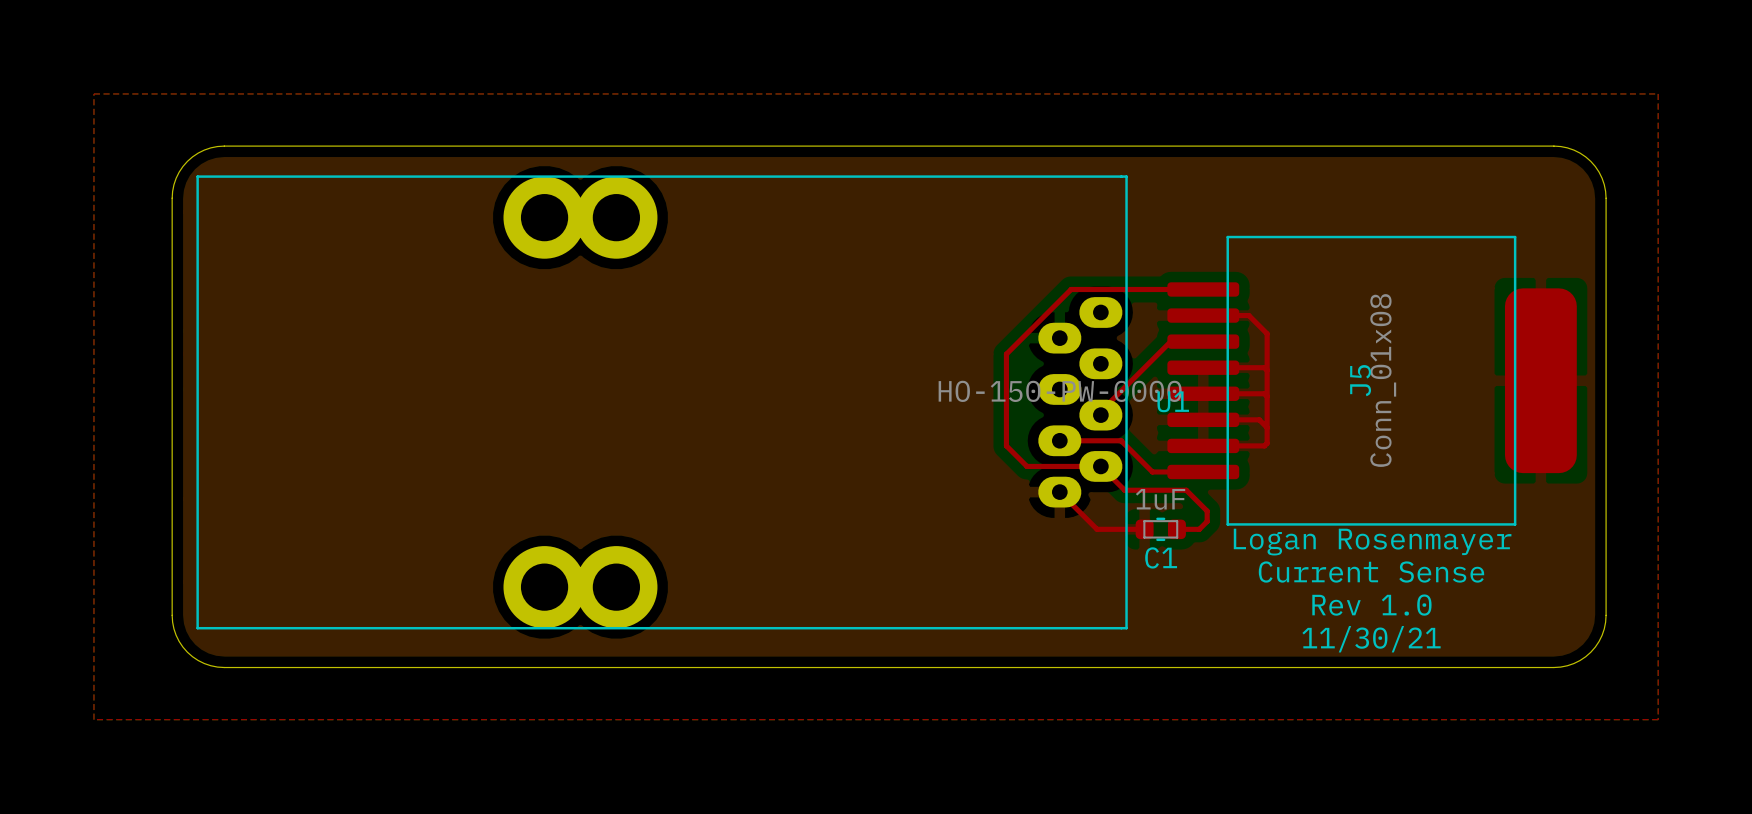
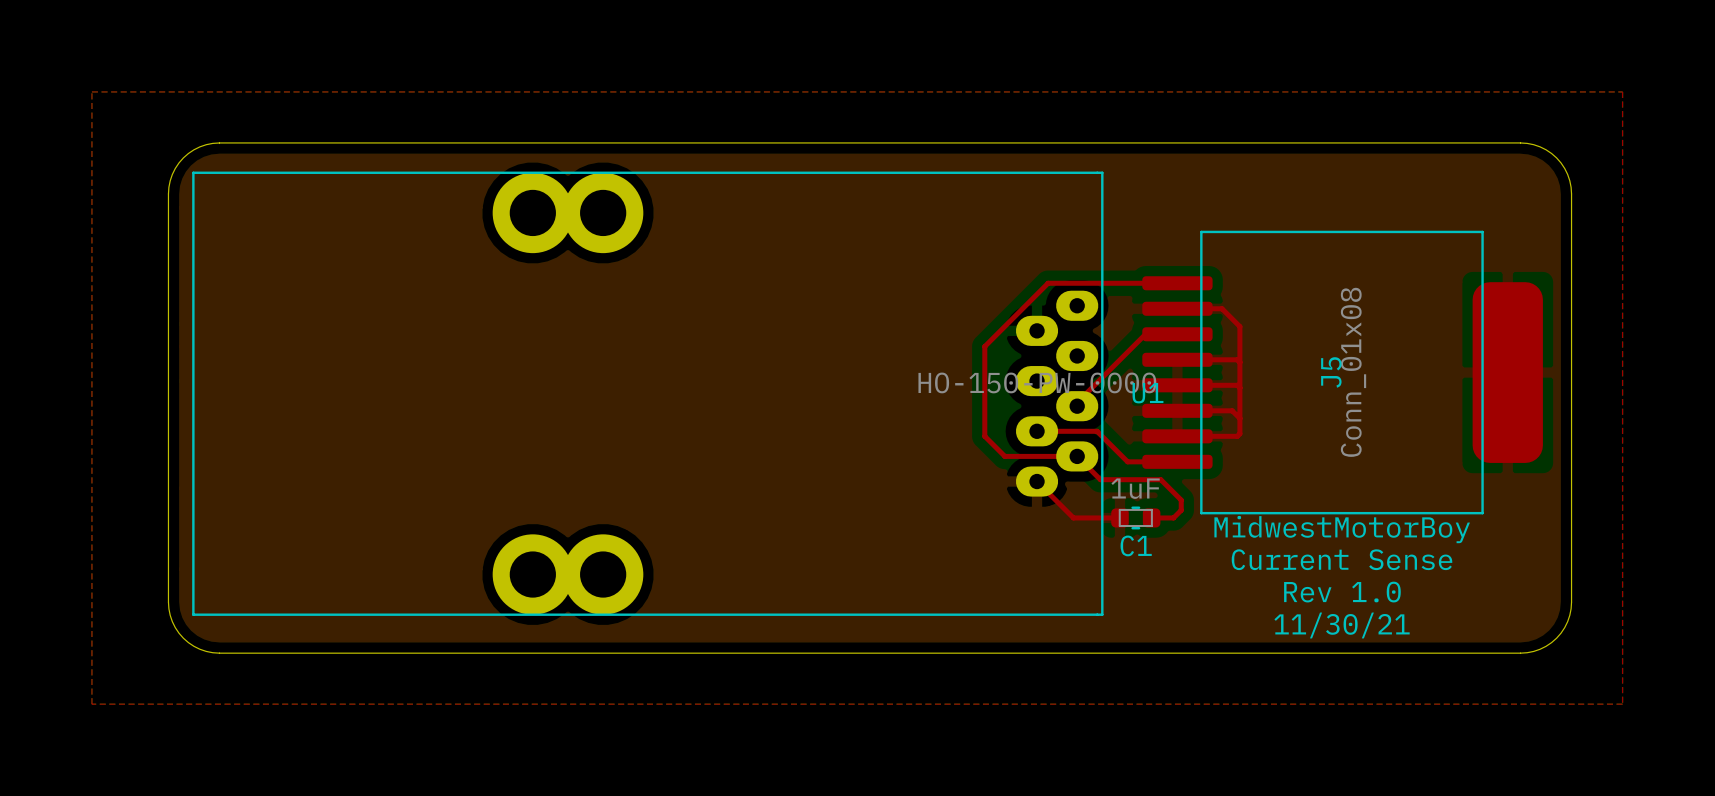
text: Logan Rosenmayer (1372, 542) -> MidwestMotorBoy (1342, 529)

